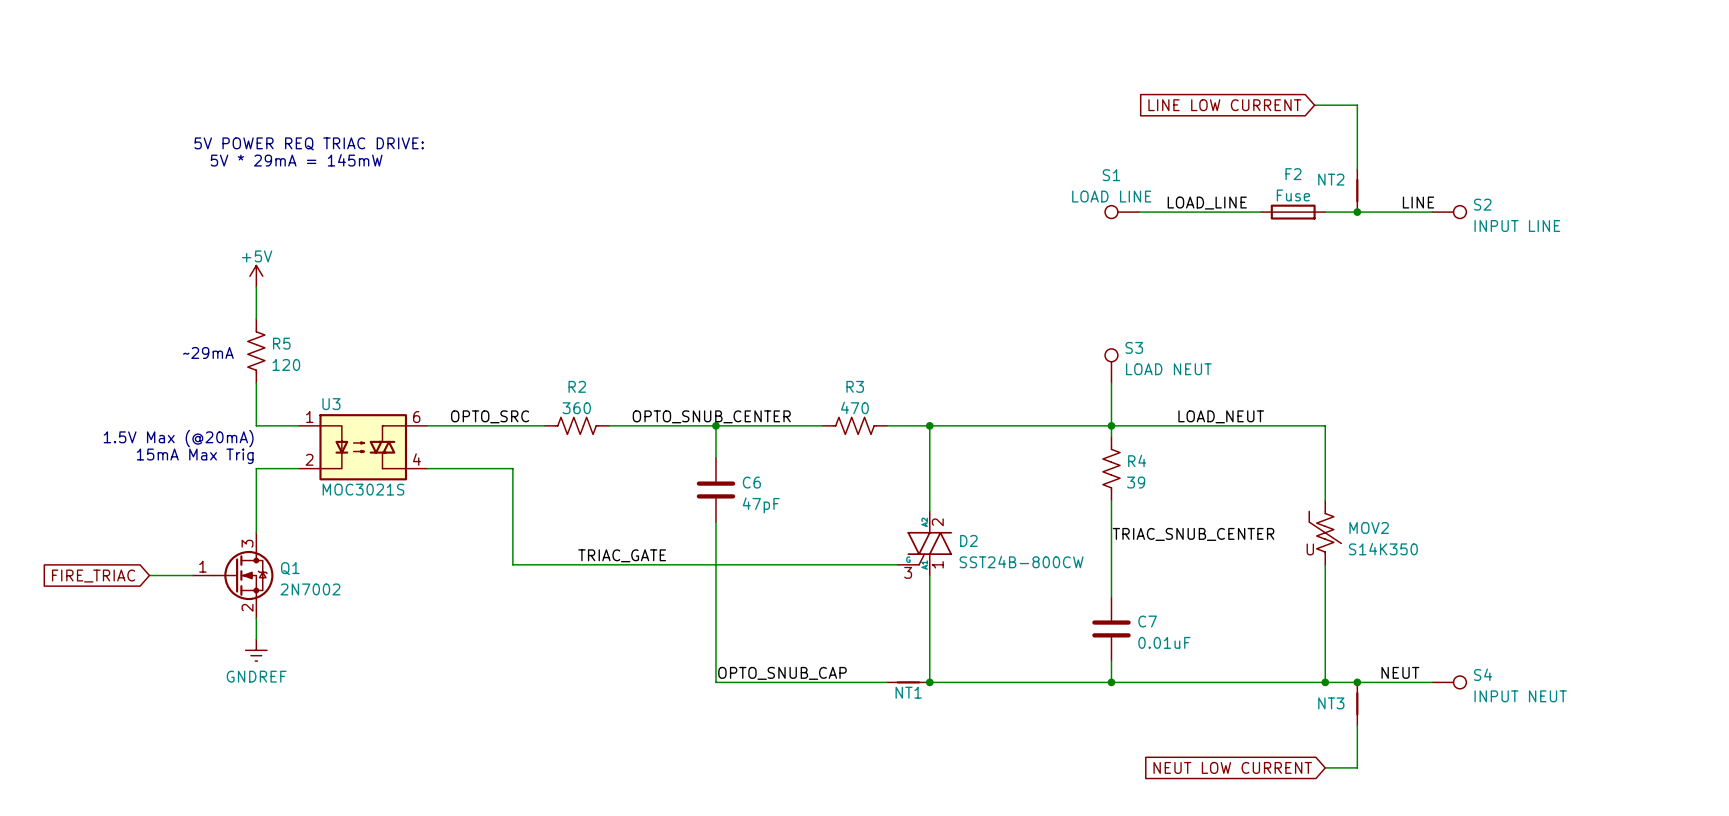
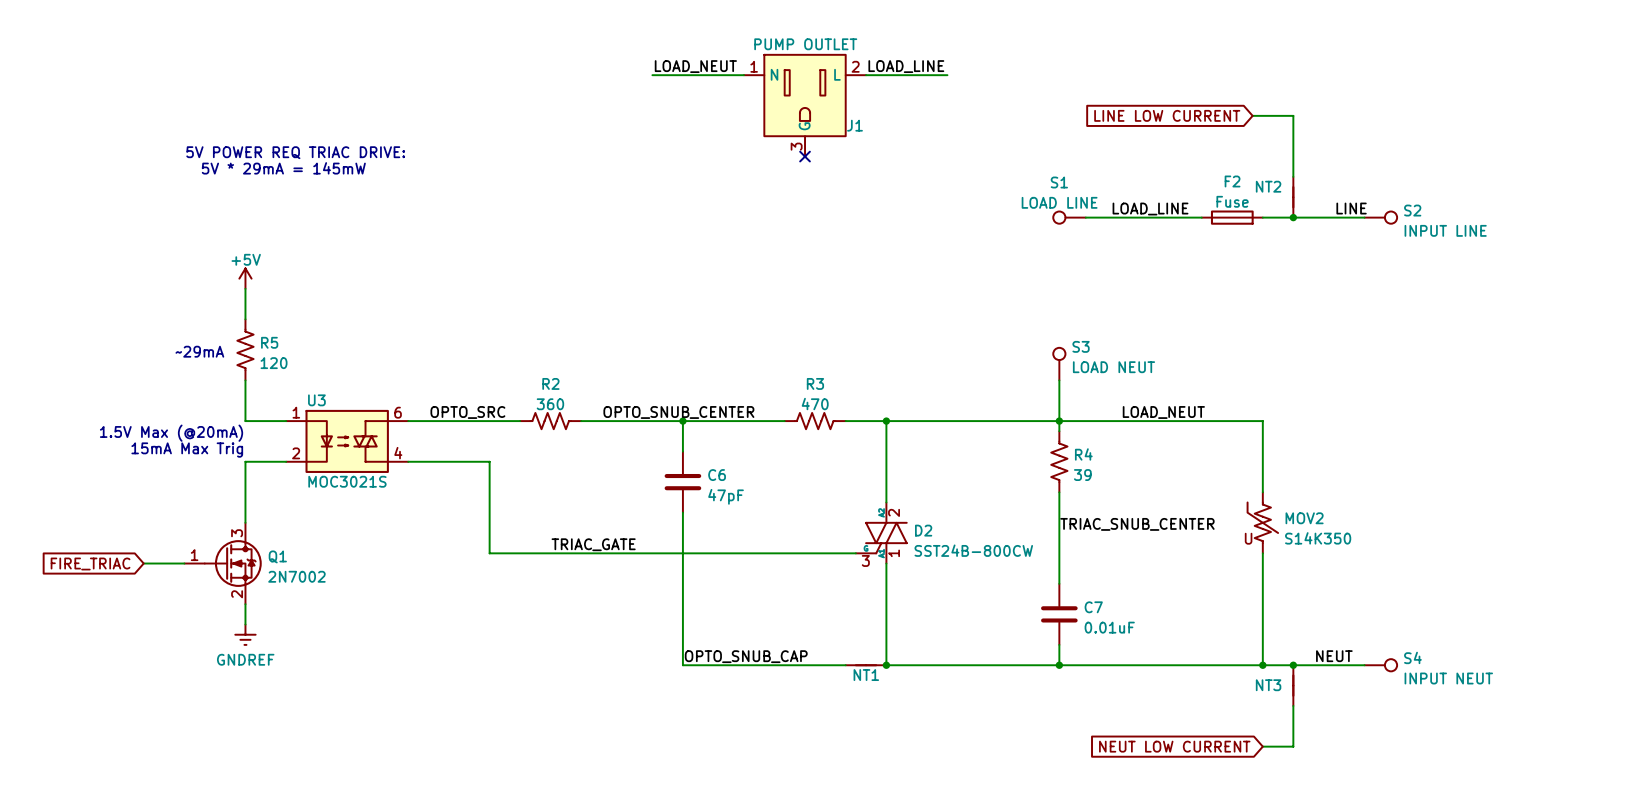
label: none -> LOAD_NEUT (695, 66)
label: none -> LOAD_LINE (906, 66)
wire: none -> (652, 75) (743, 75)
wire: none -> (866, 75) (947, 75)
J1: none -> PUMP OUTLET (805, 105)
no-connect mark: none -> (805, 156)

